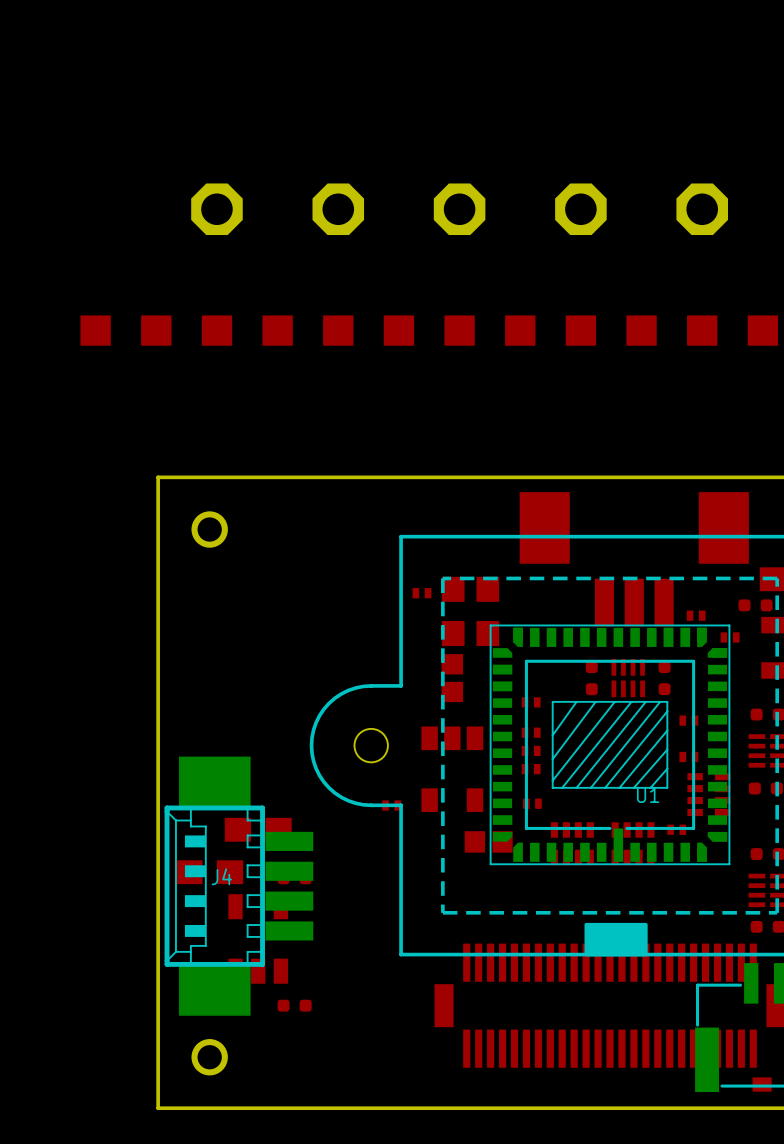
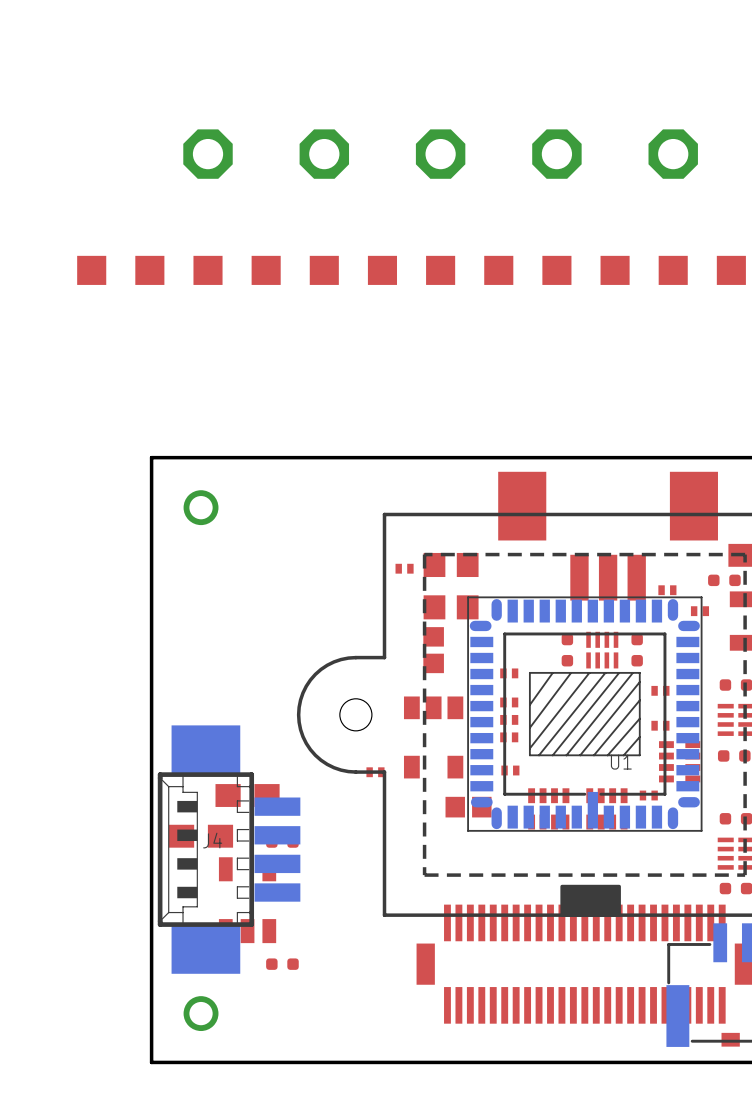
part position: (216, 209) -> (208, 154)
part position: (338, 209) -> (324, 154)
part position: (459, 209) -> (440, 154)
part position: (580, 209) -> (556, 154)
part position: (702, 209) -> (673, 154)
part position: (125, 330) -> (120, 270)
part position: (247, 330) -> (237, 270)
part position: (368, 330) -> (353, 270)
part position: (489, 330) -> (469, 270)
part position: (611, 330) -> (585, 270)
part position: (732, 330) -> (702, 270)
U1 footprint: [489, 624, 731, 866] -> [467, 596, 703, 832]

